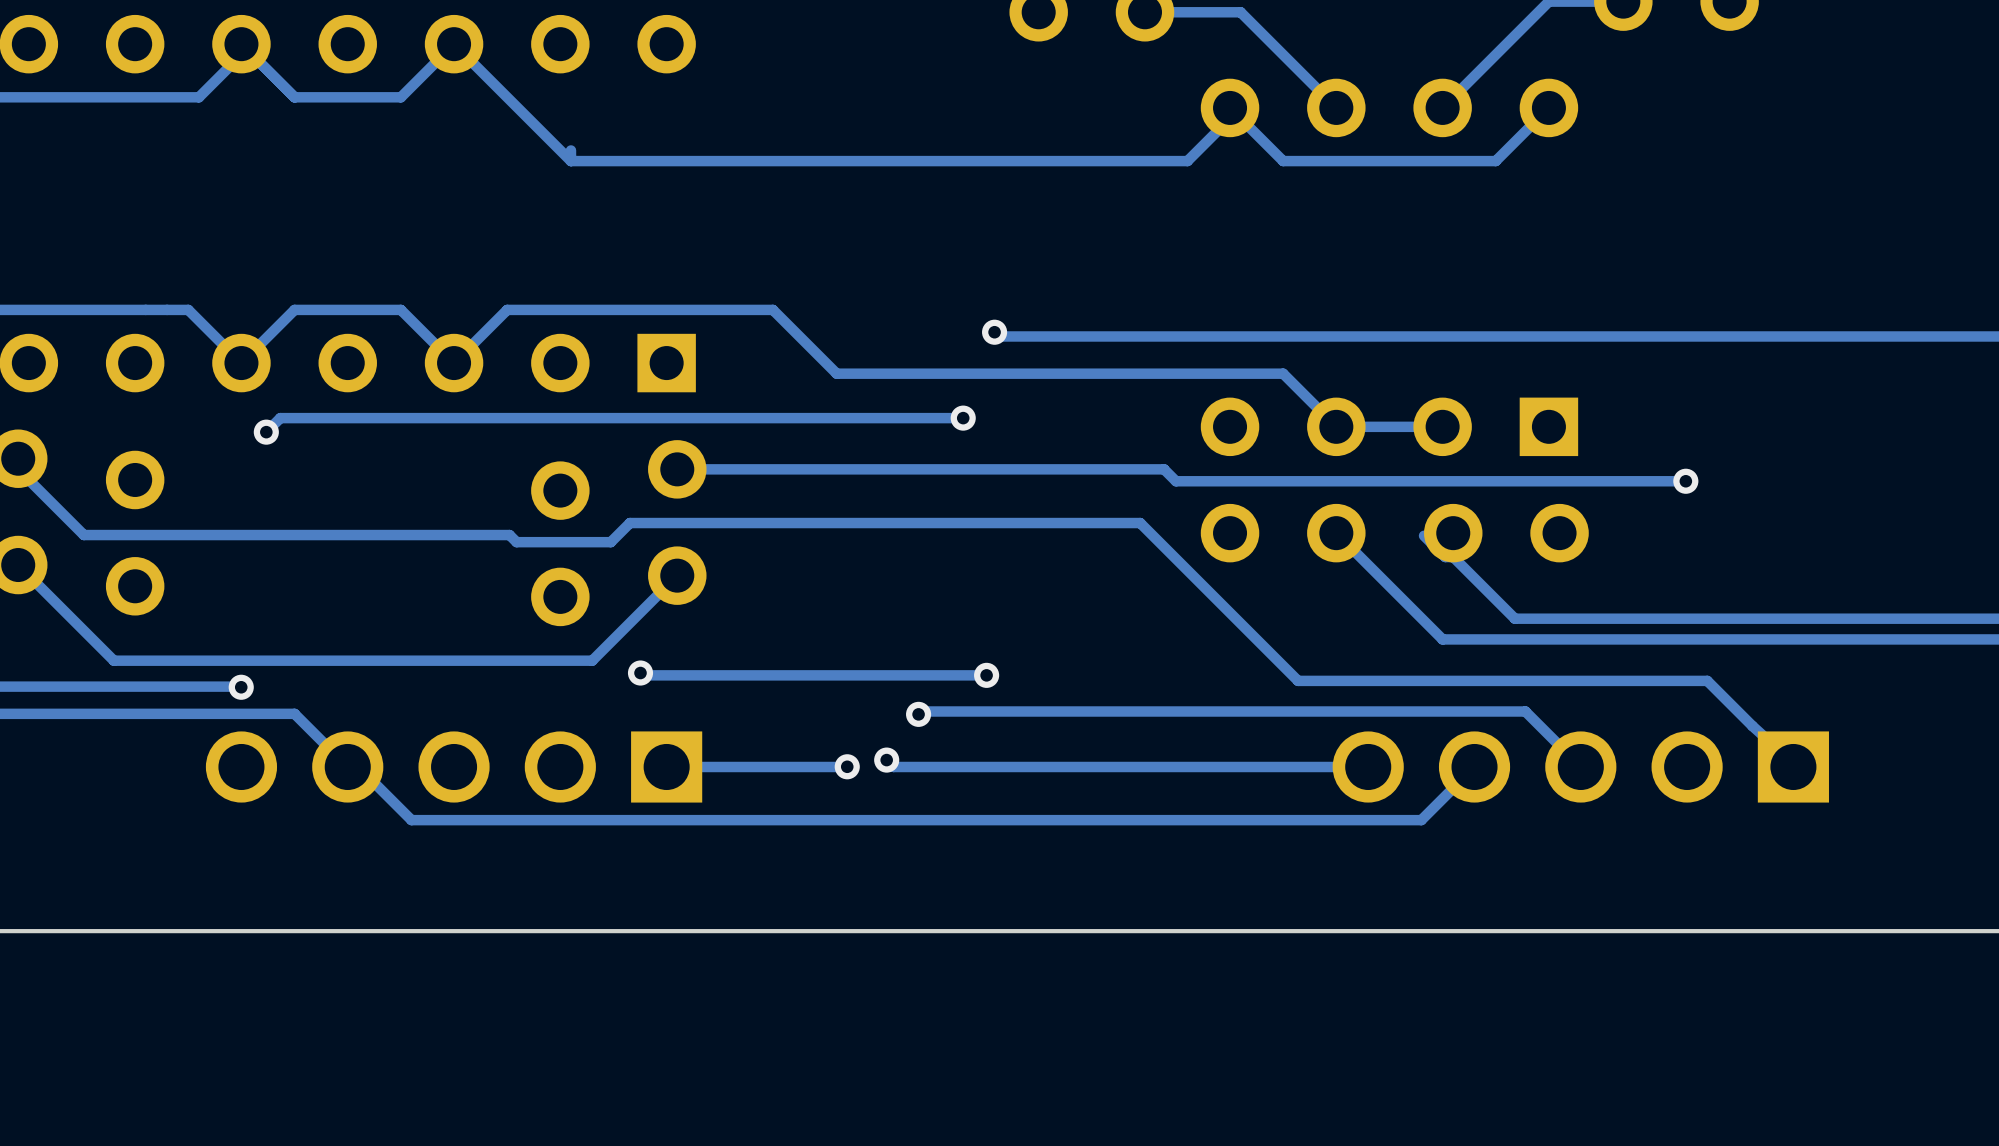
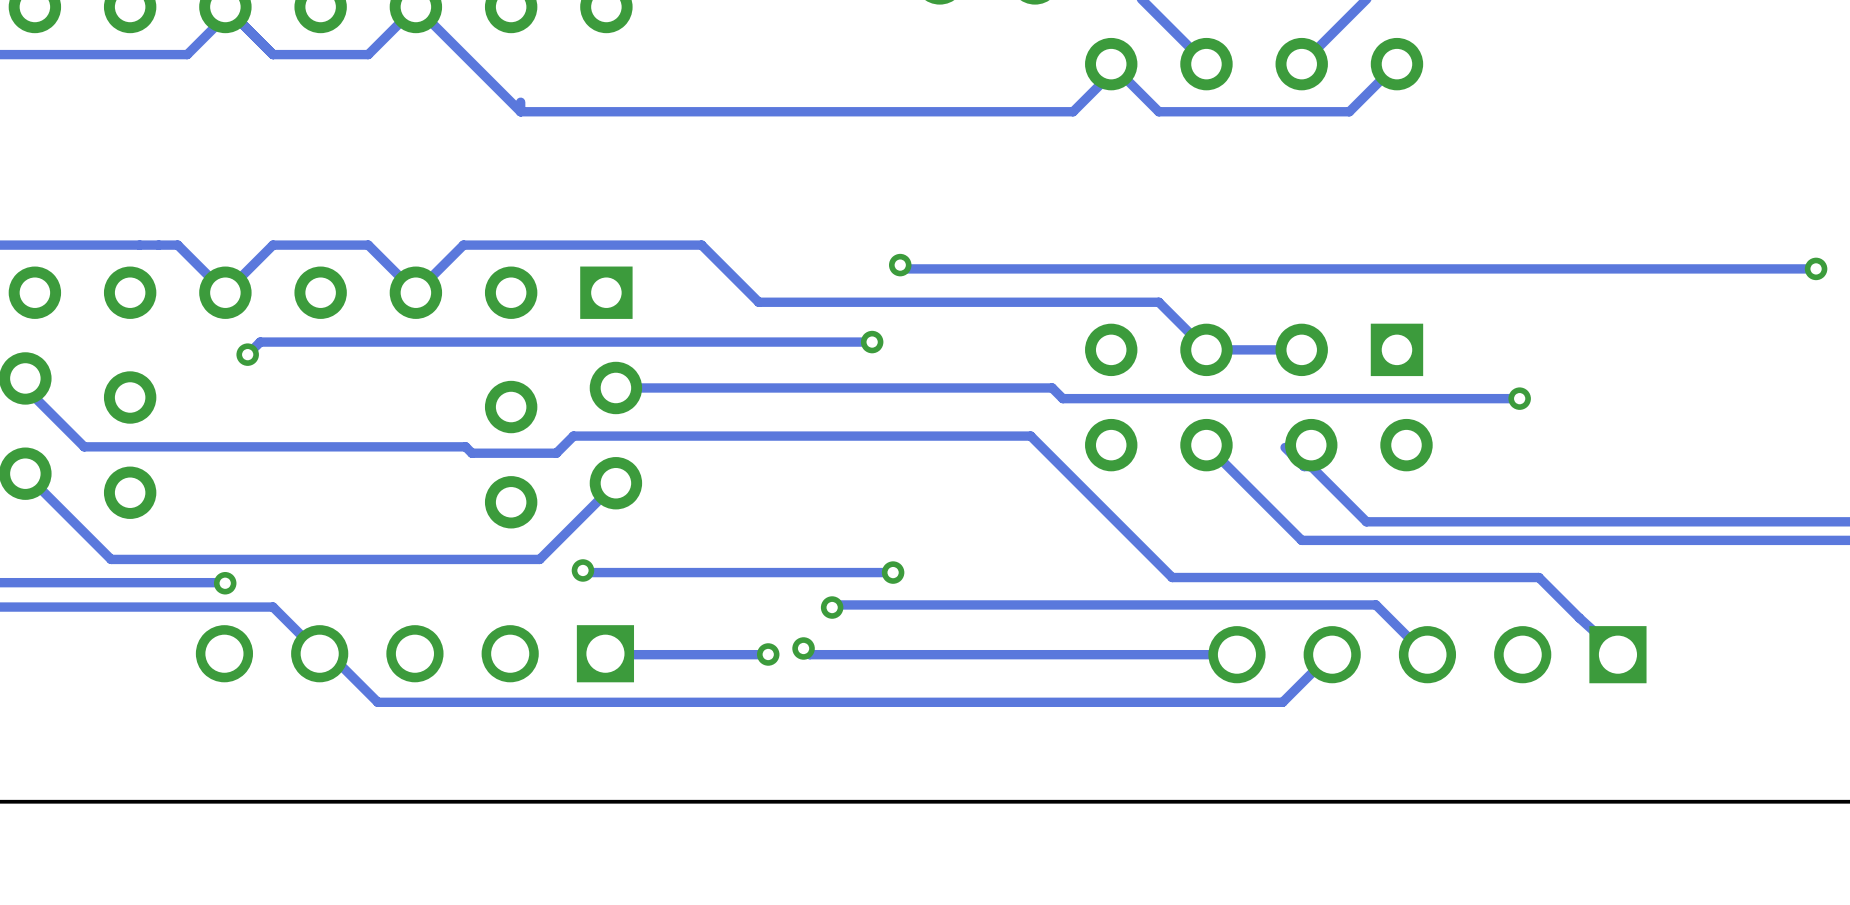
part footprint: [205, 731, 703, 803] -> [195, 625, 635, 683]
part footprint: [1332, 731, 1829, 803] -> [1208, 626, 1647, 684]

